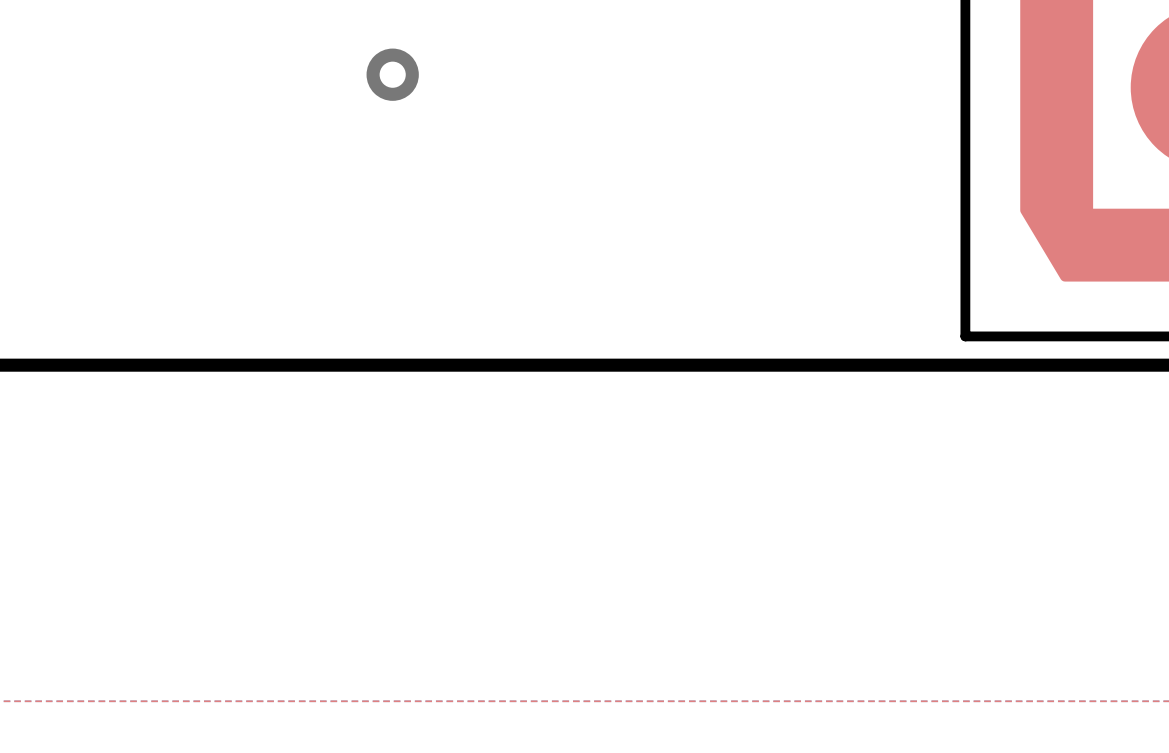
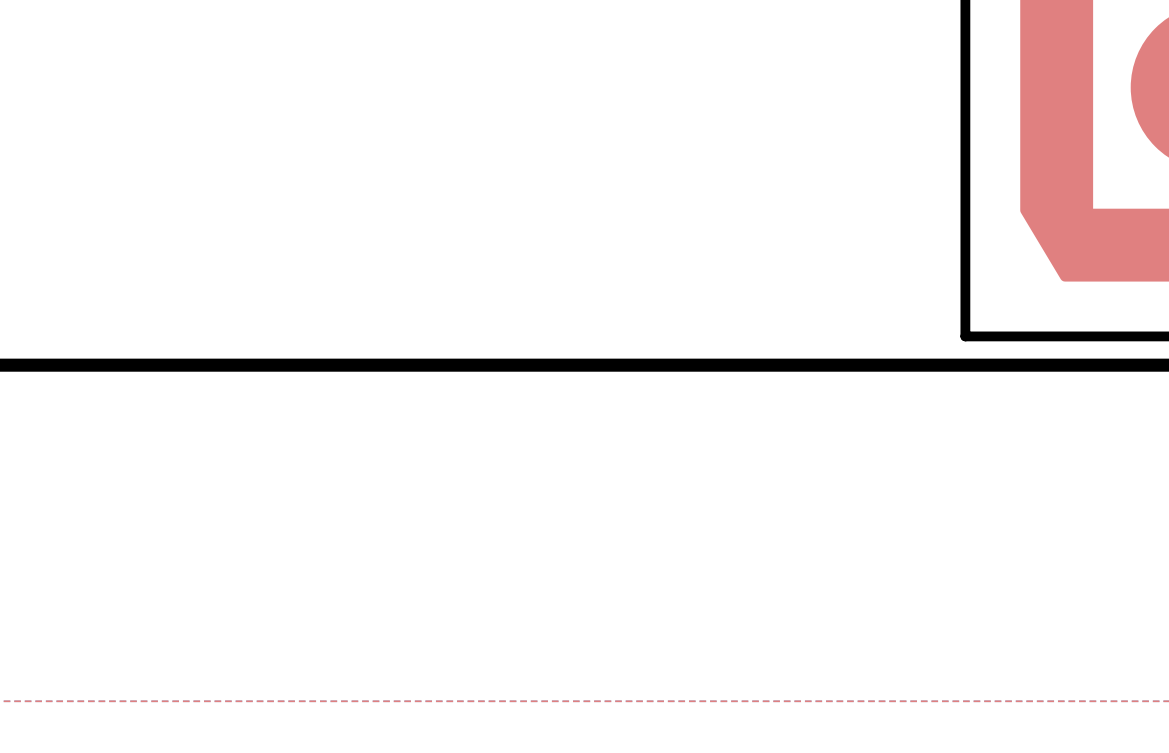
via: (392, 74) -> none

